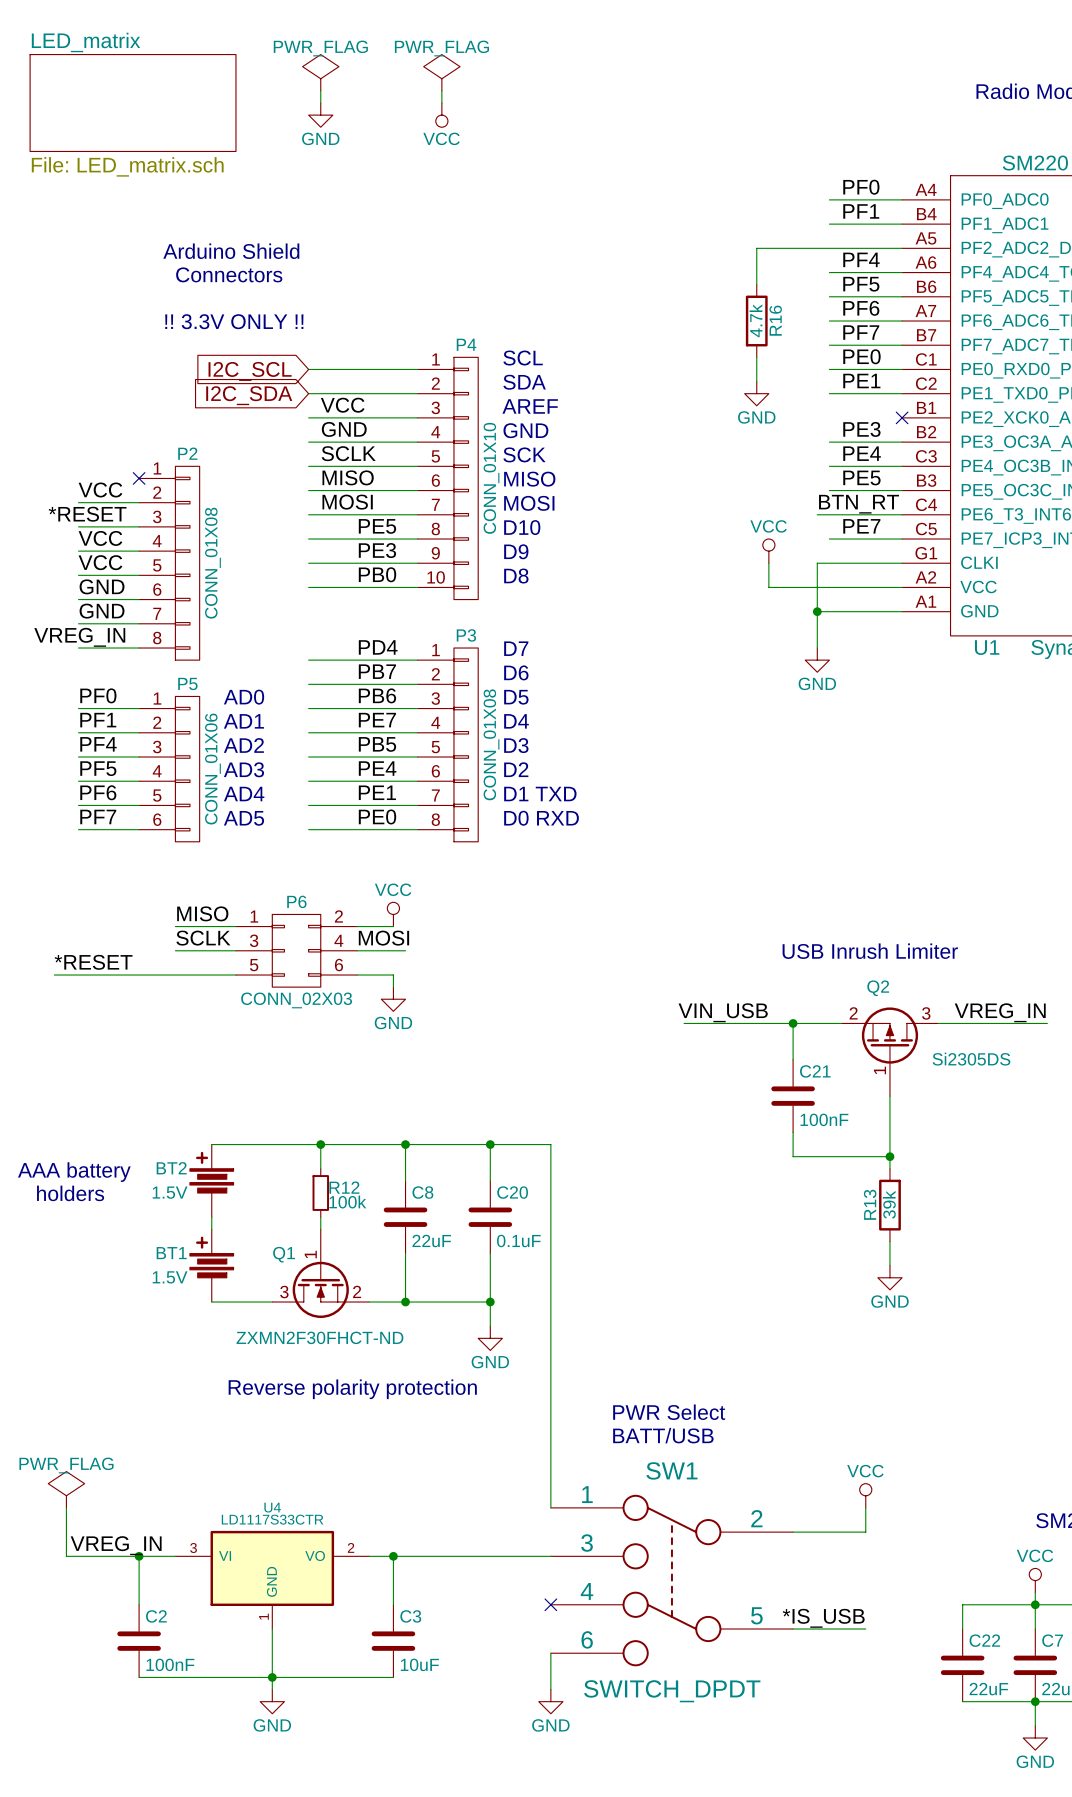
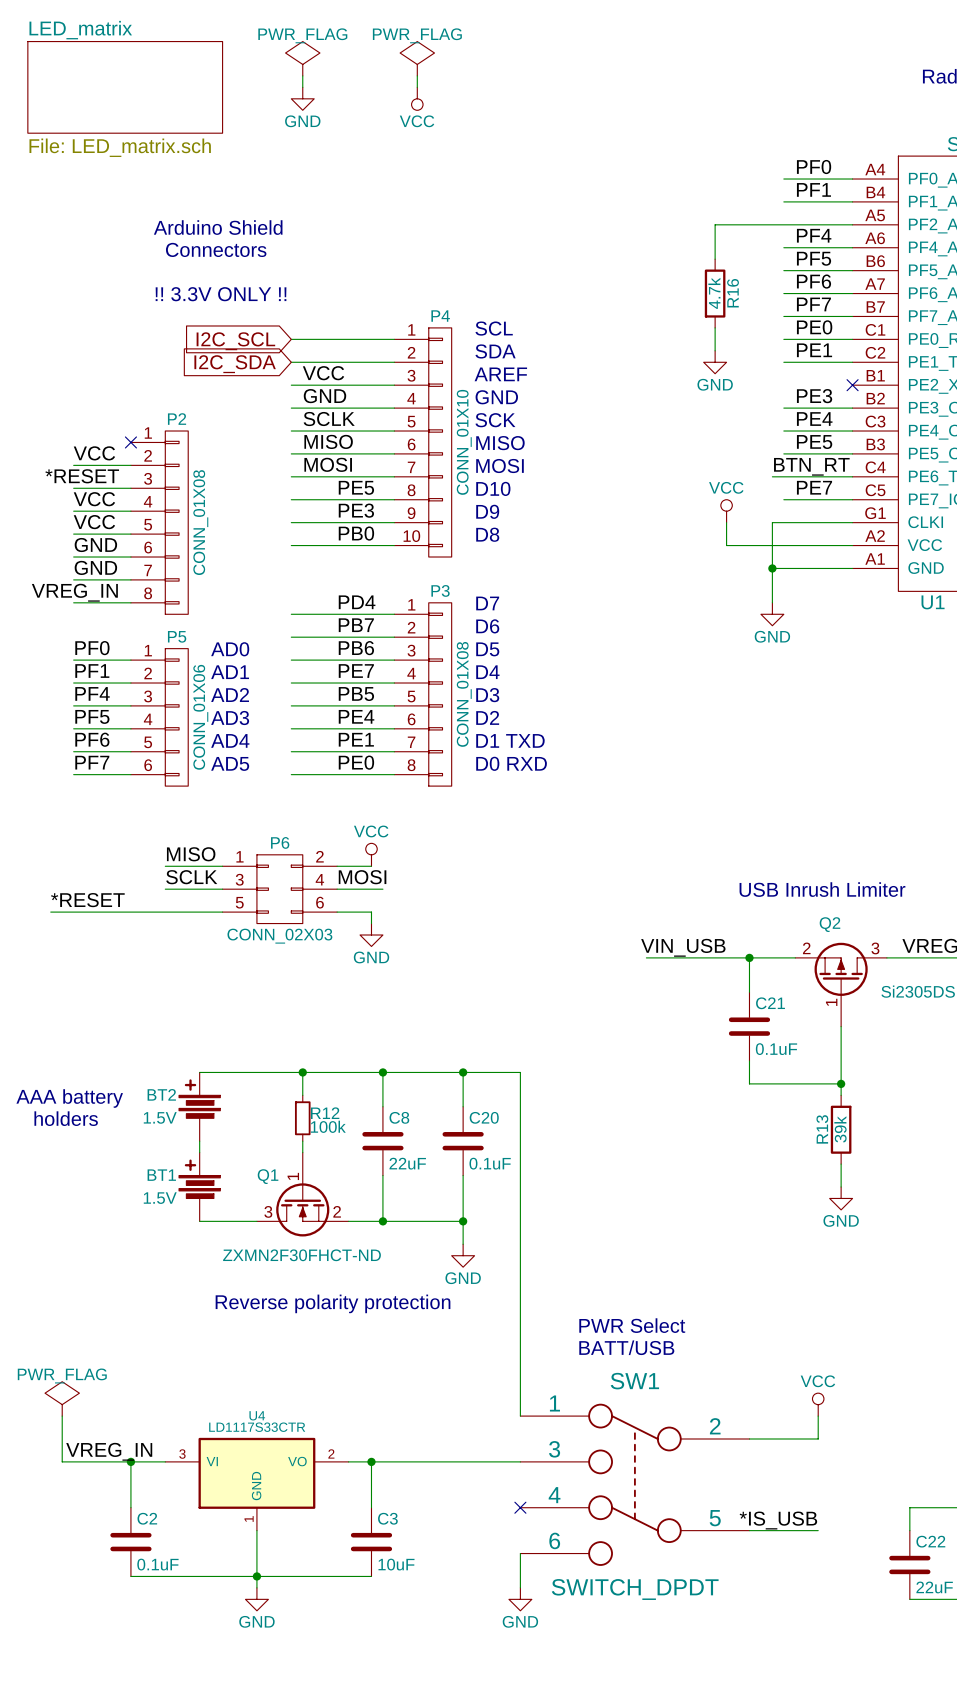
C21 value: 100nF (824, 1119) -> 0.1uF (776, 1049)
C2 value: 100nF (170, 1664) -> 0.1uF (157, 1564)

